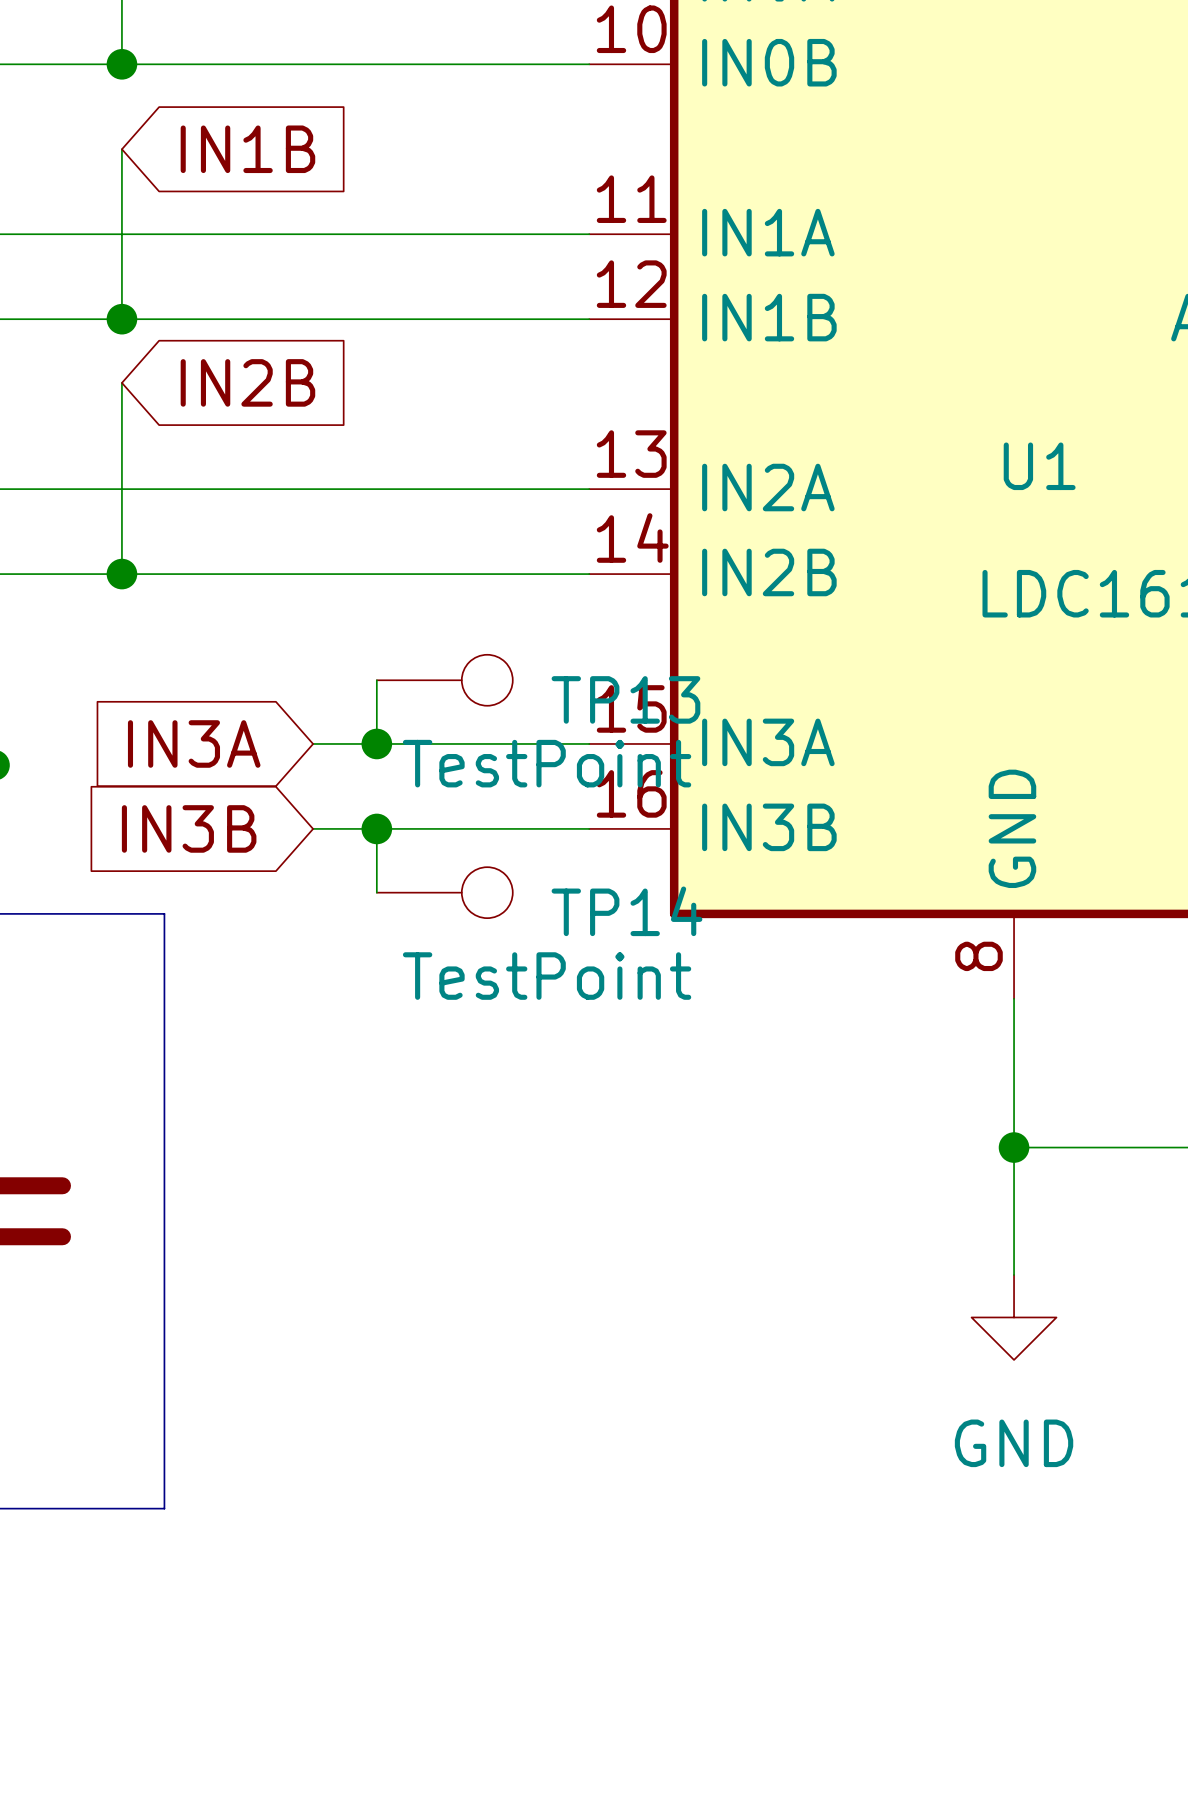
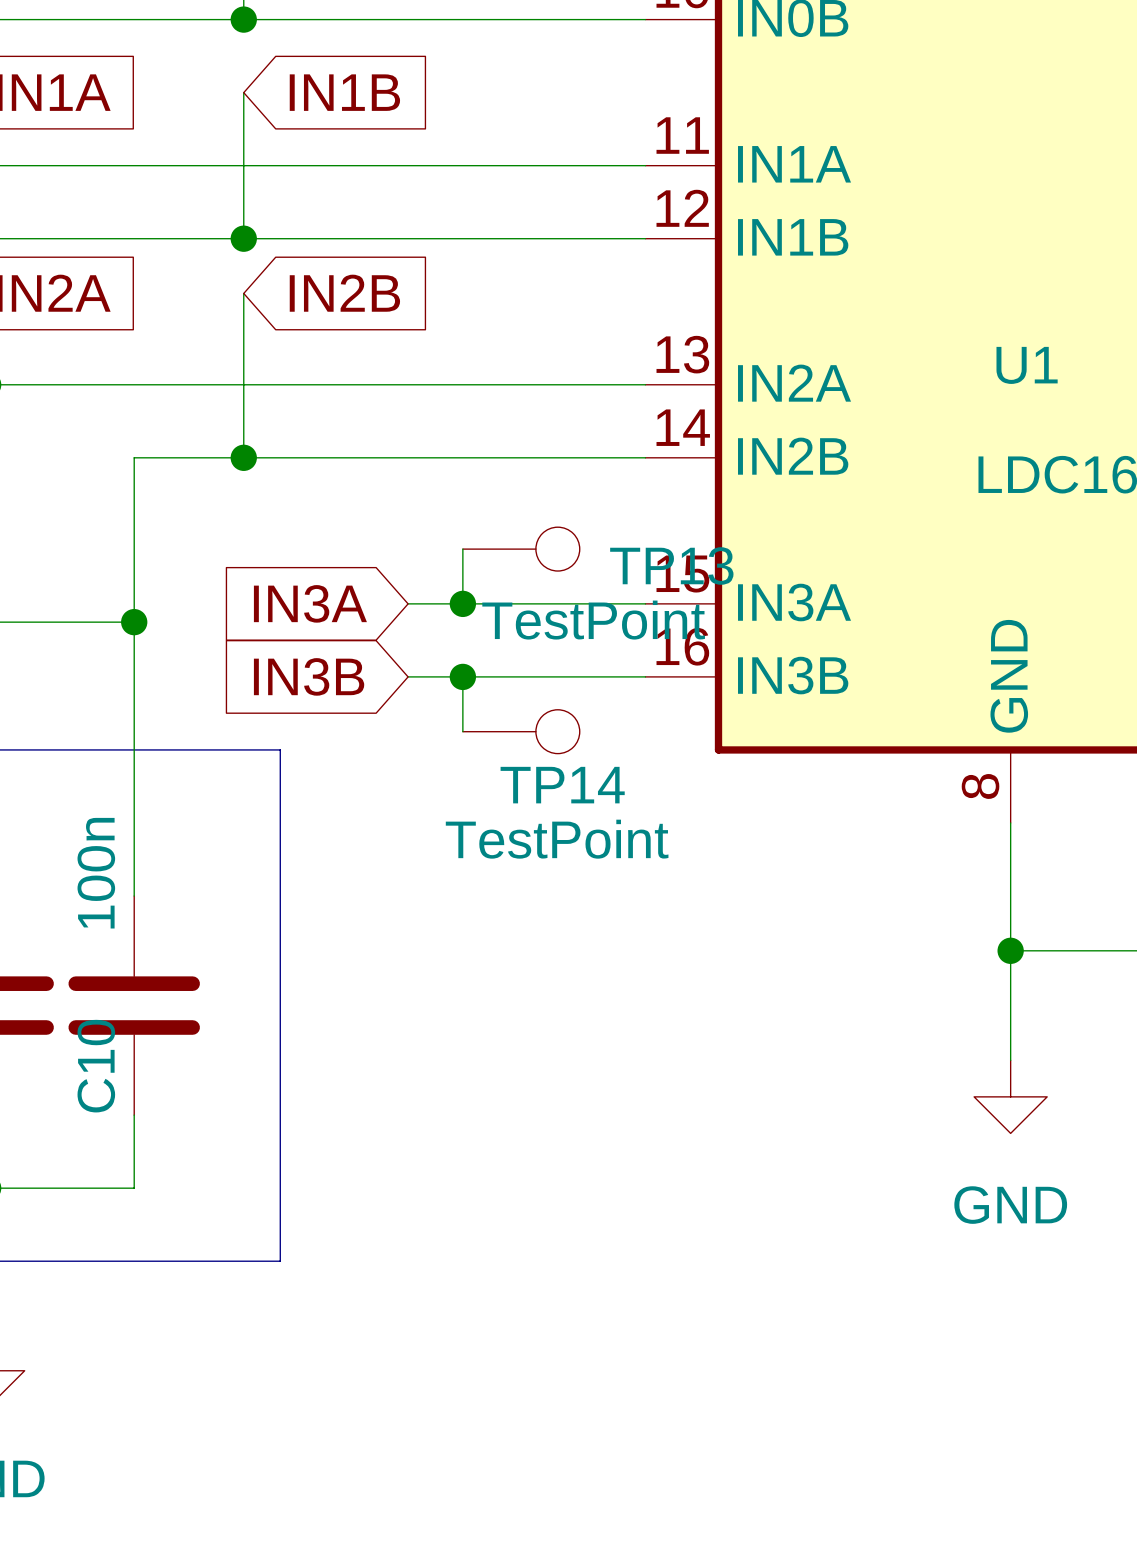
TP14 name position: TP14 (626, 911) -> TP14 (562, 785)
TP14 value position: TestPoint (547, 976) -> TestPoint (557, 839)

